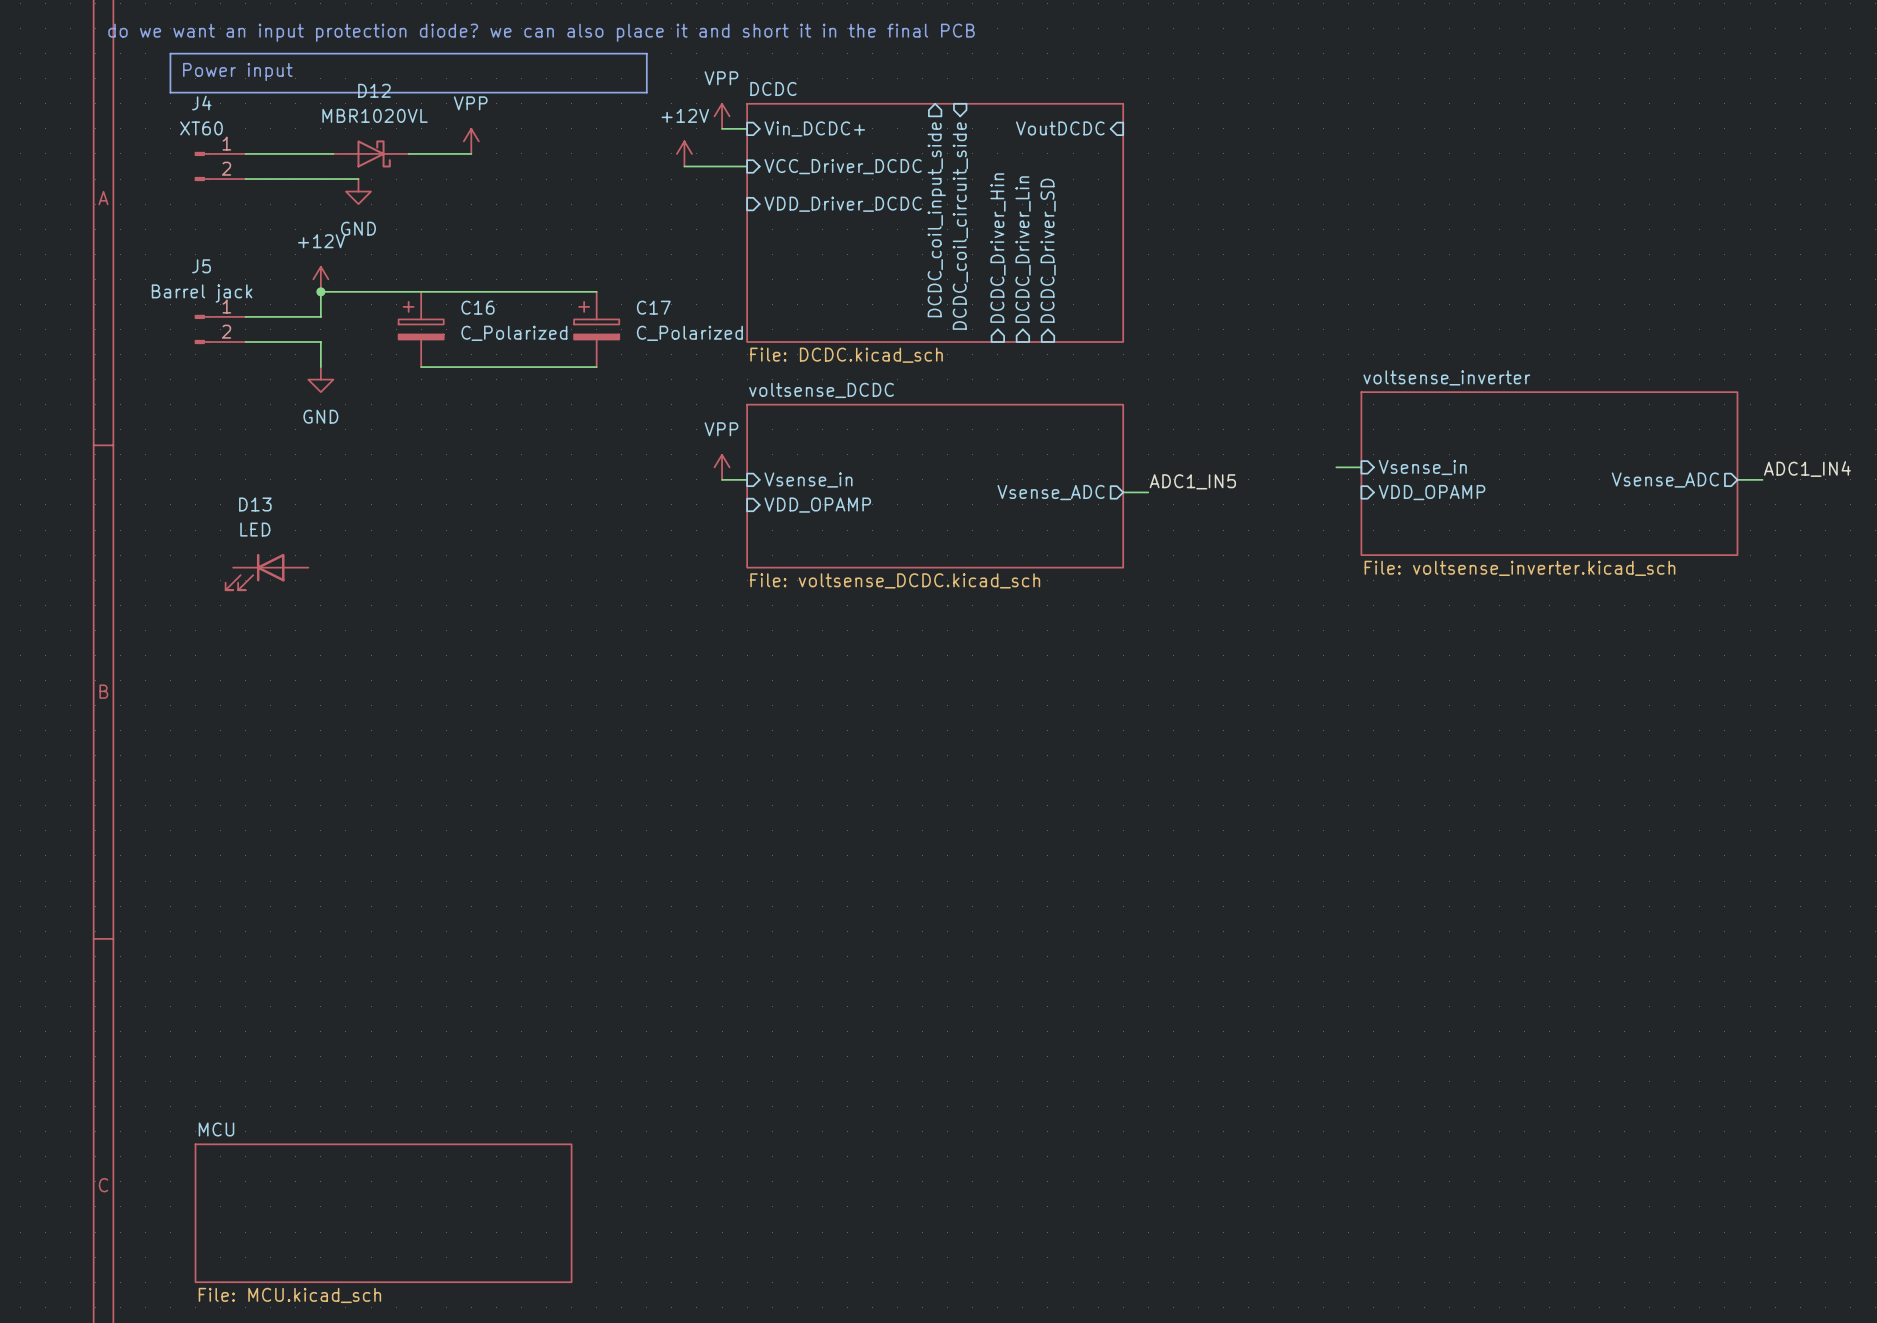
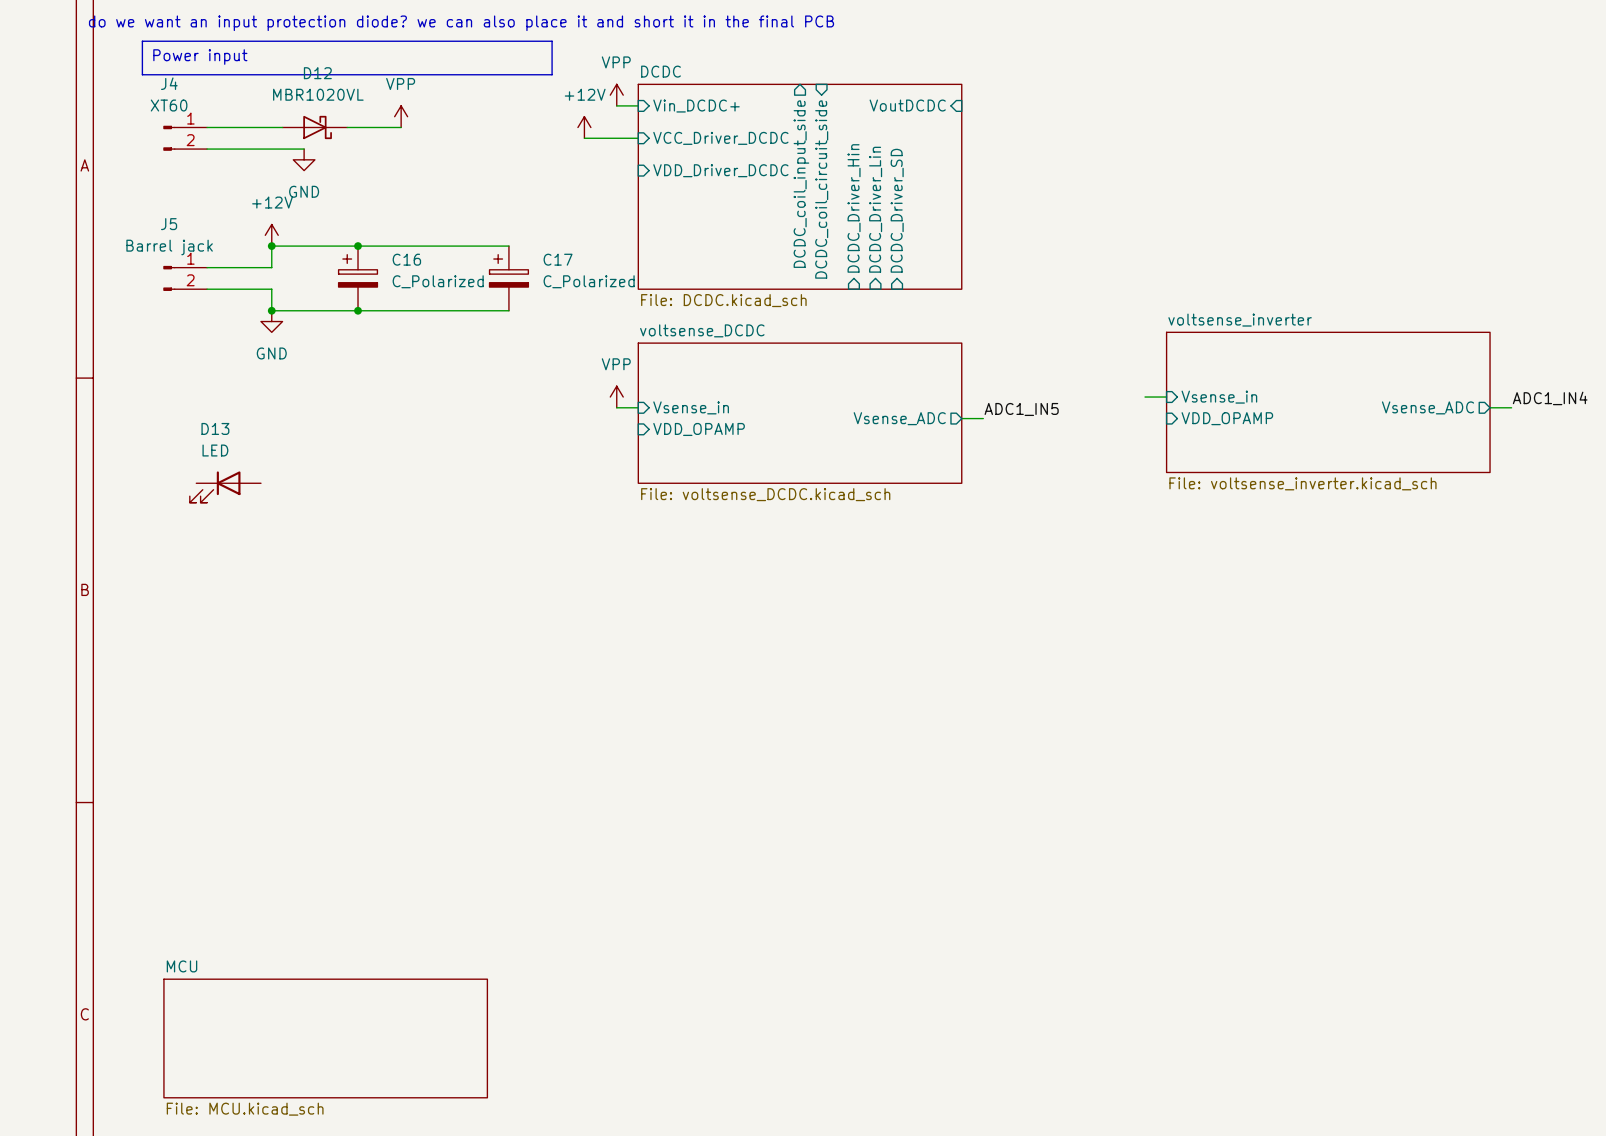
junction: none -> (358, 246)
wire: none -> (271, 310) (358, 310)
junction: none -> (271, 310)
junction: none -> (358, 310)

